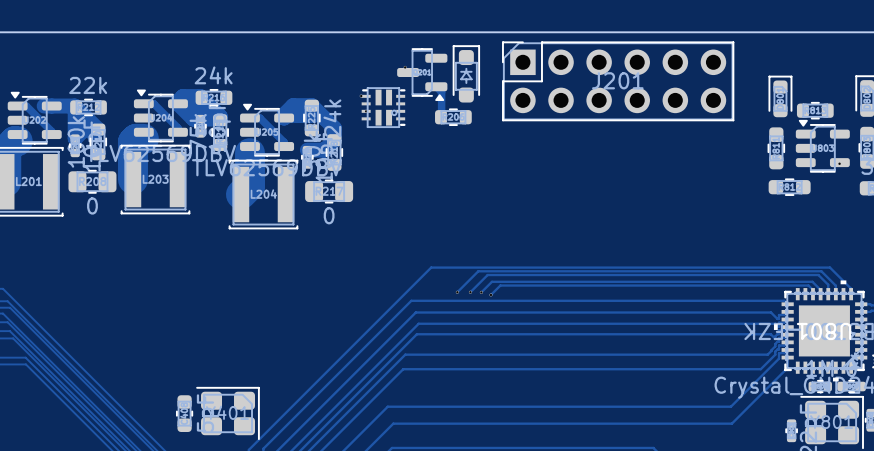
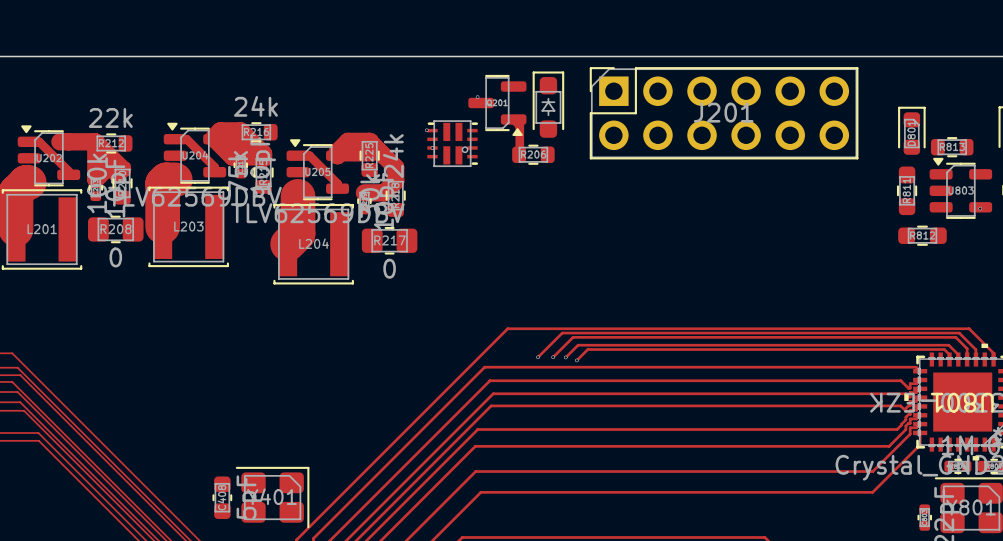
track: (746, 390) (730, 406) (387, 406) -> (872, 471) (475, 471) (457, 489)
track: (746, 408) (731, 423) (393, 423) -> (872, 492) (480, 492) (463, 509)

